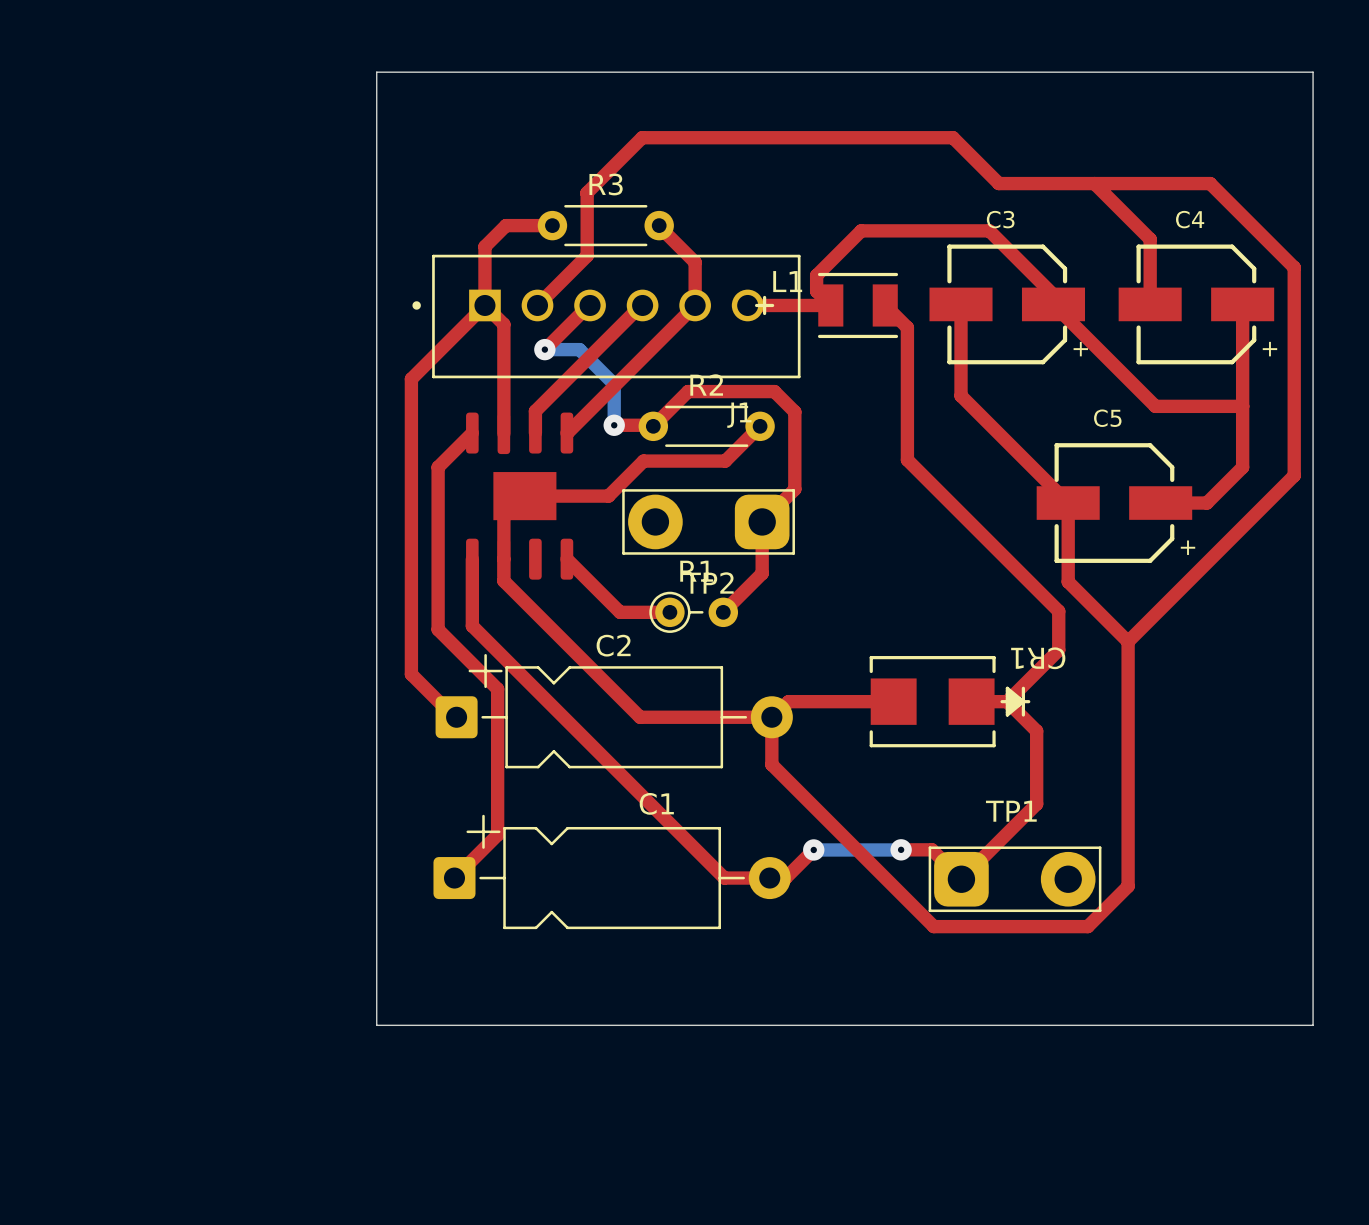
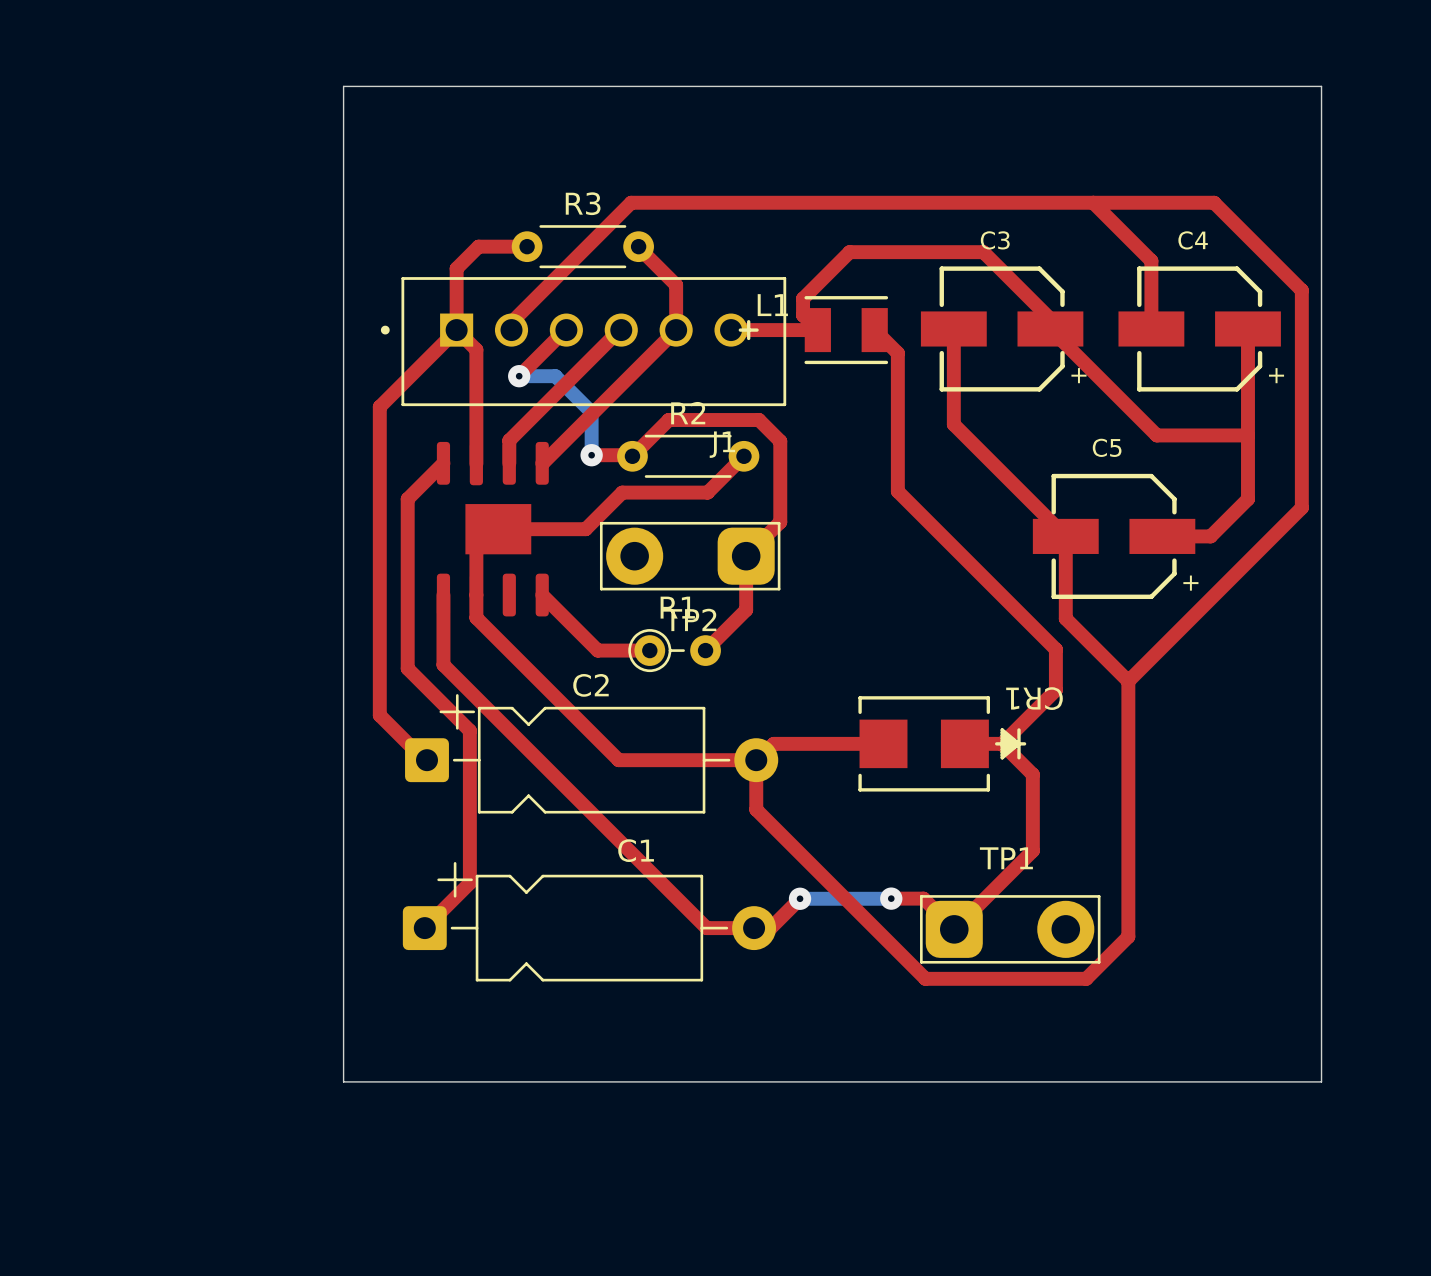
top track: (998, 183) (952, 137) (642, 137) (586, 193) -> (993, 202) (631, 202) (511, 322) (511, 330)
top track: (587, 193) (587, 255) (537, 305) -> none

